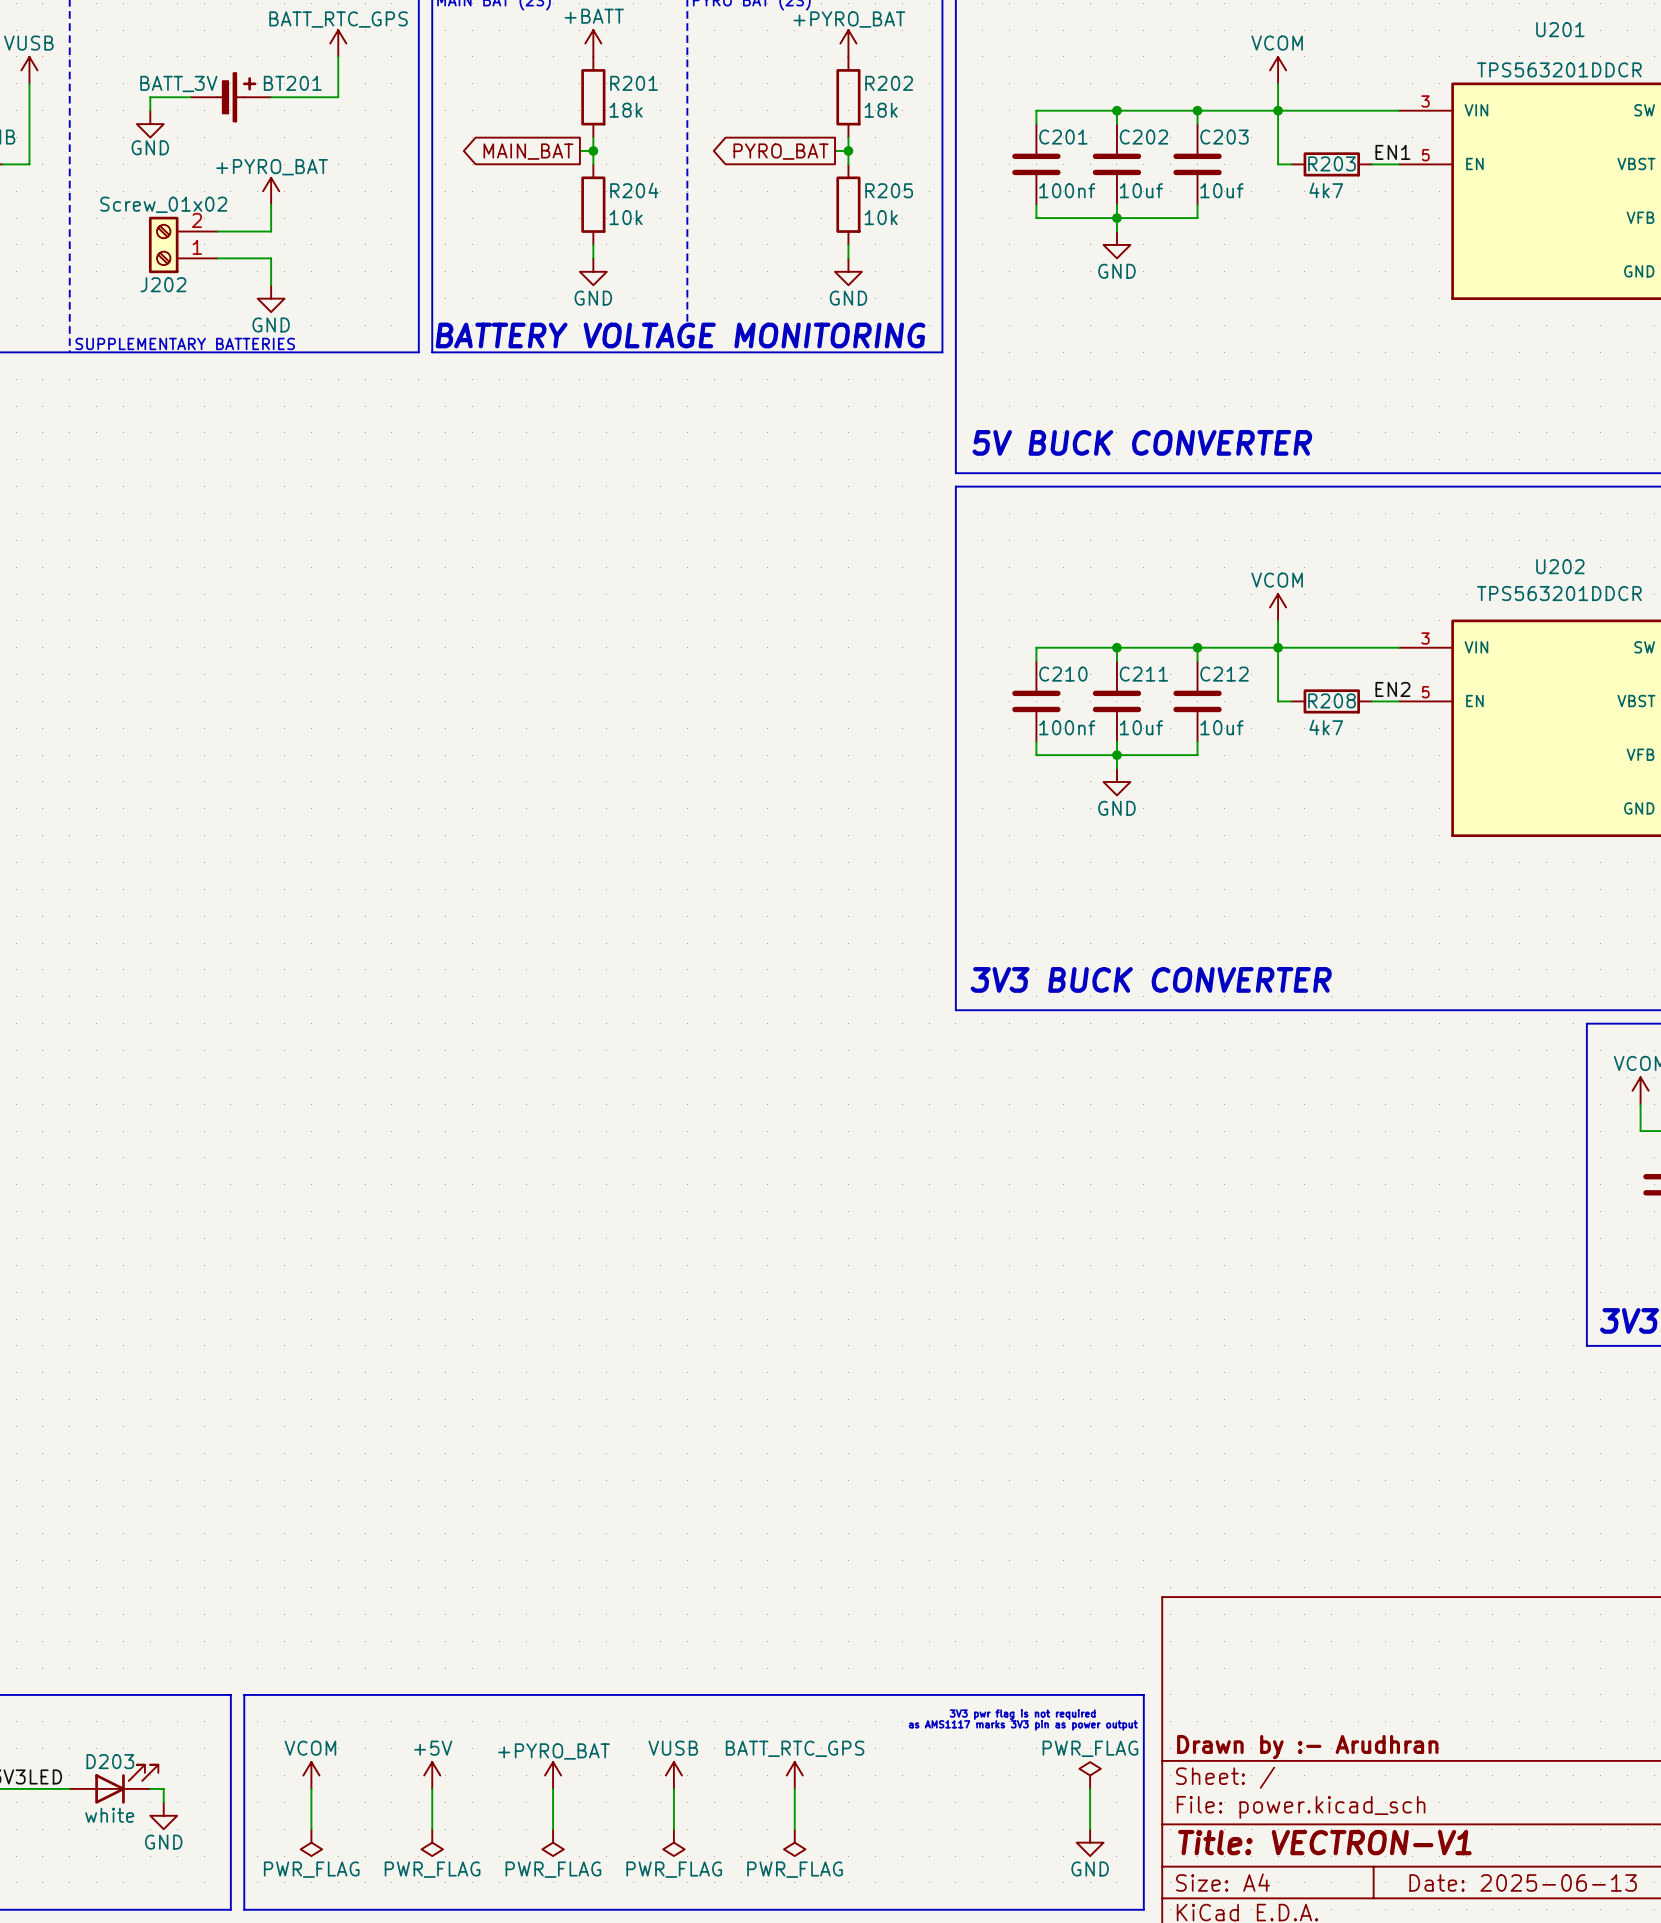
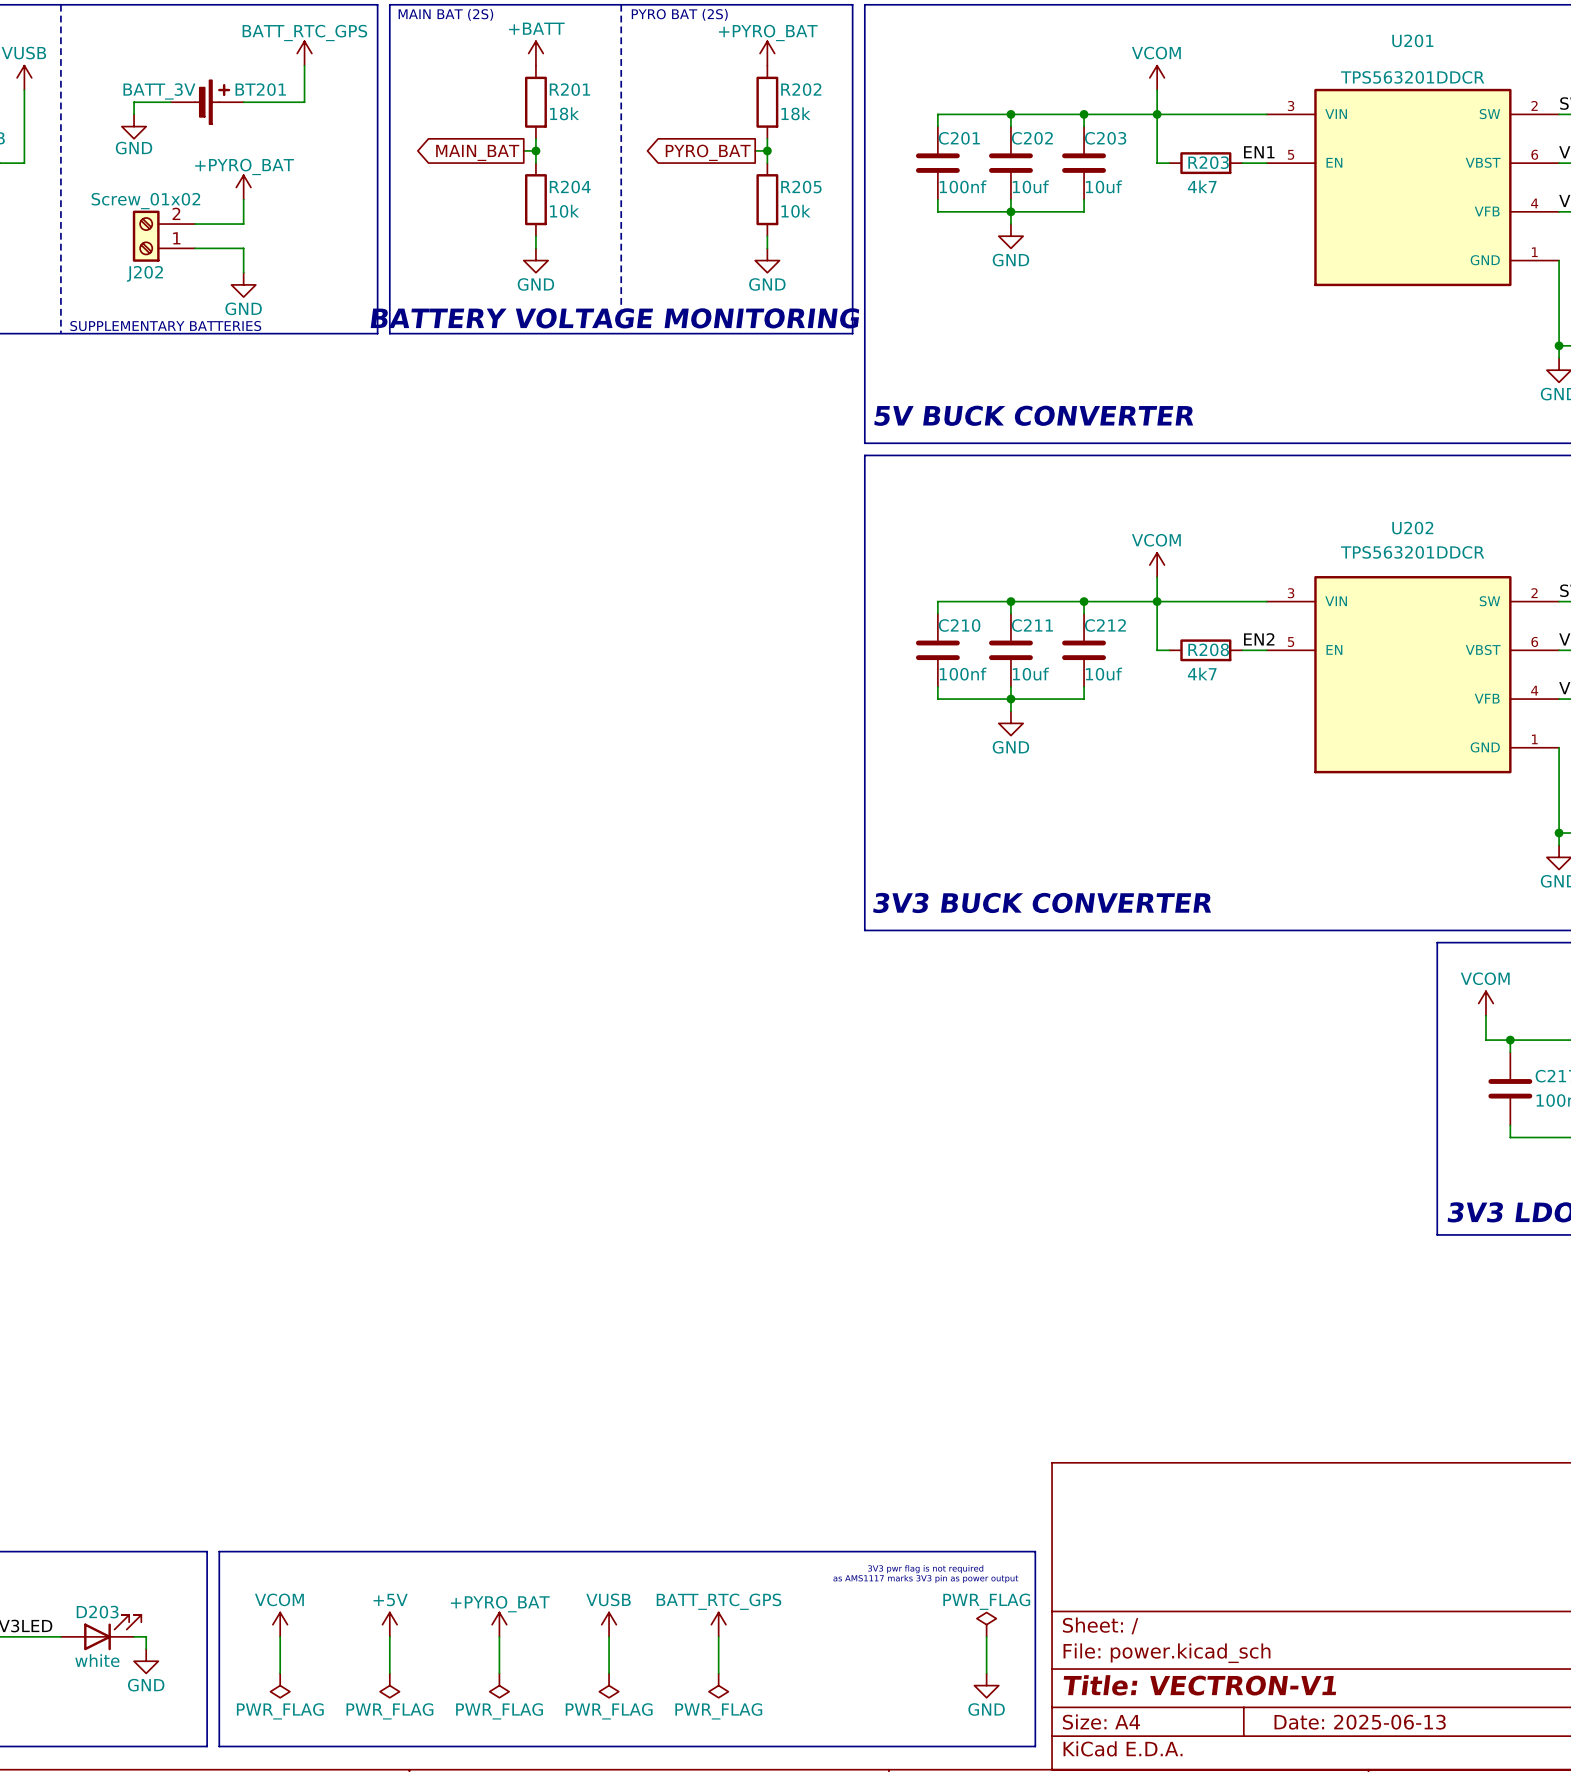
title block: Drawn by :- Arudhran (1307, 1747) -> none

